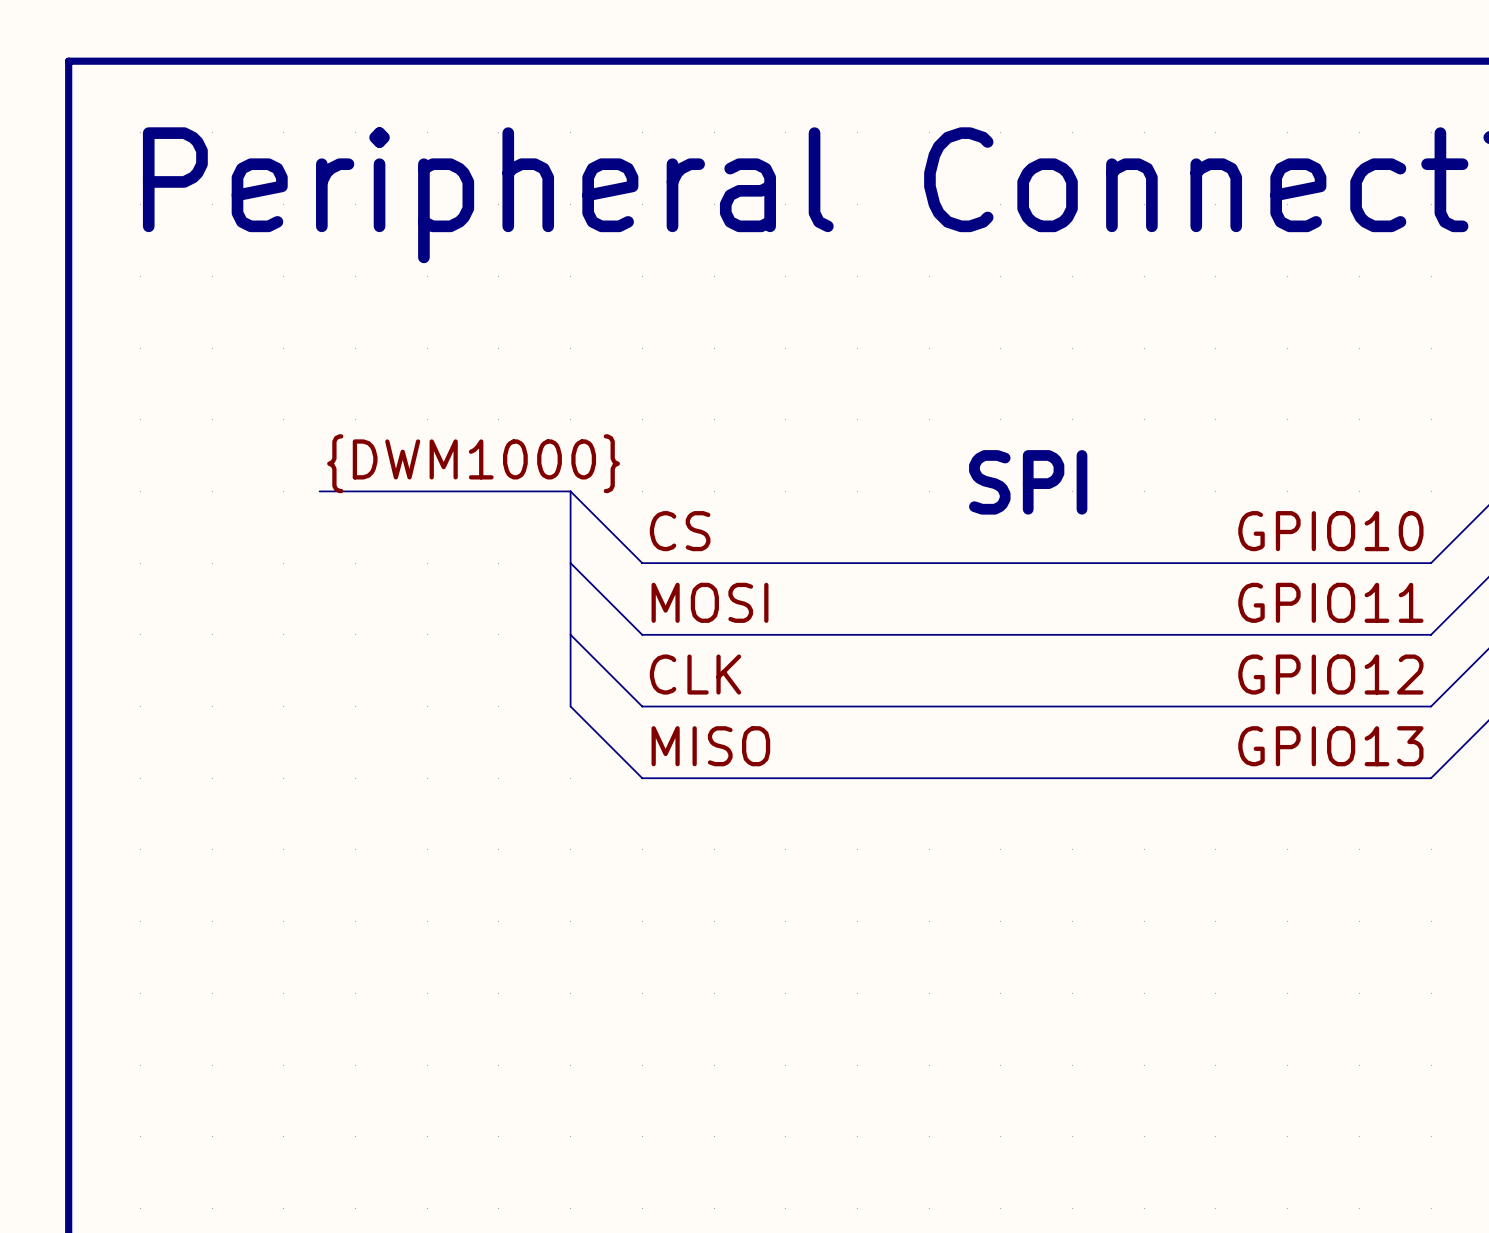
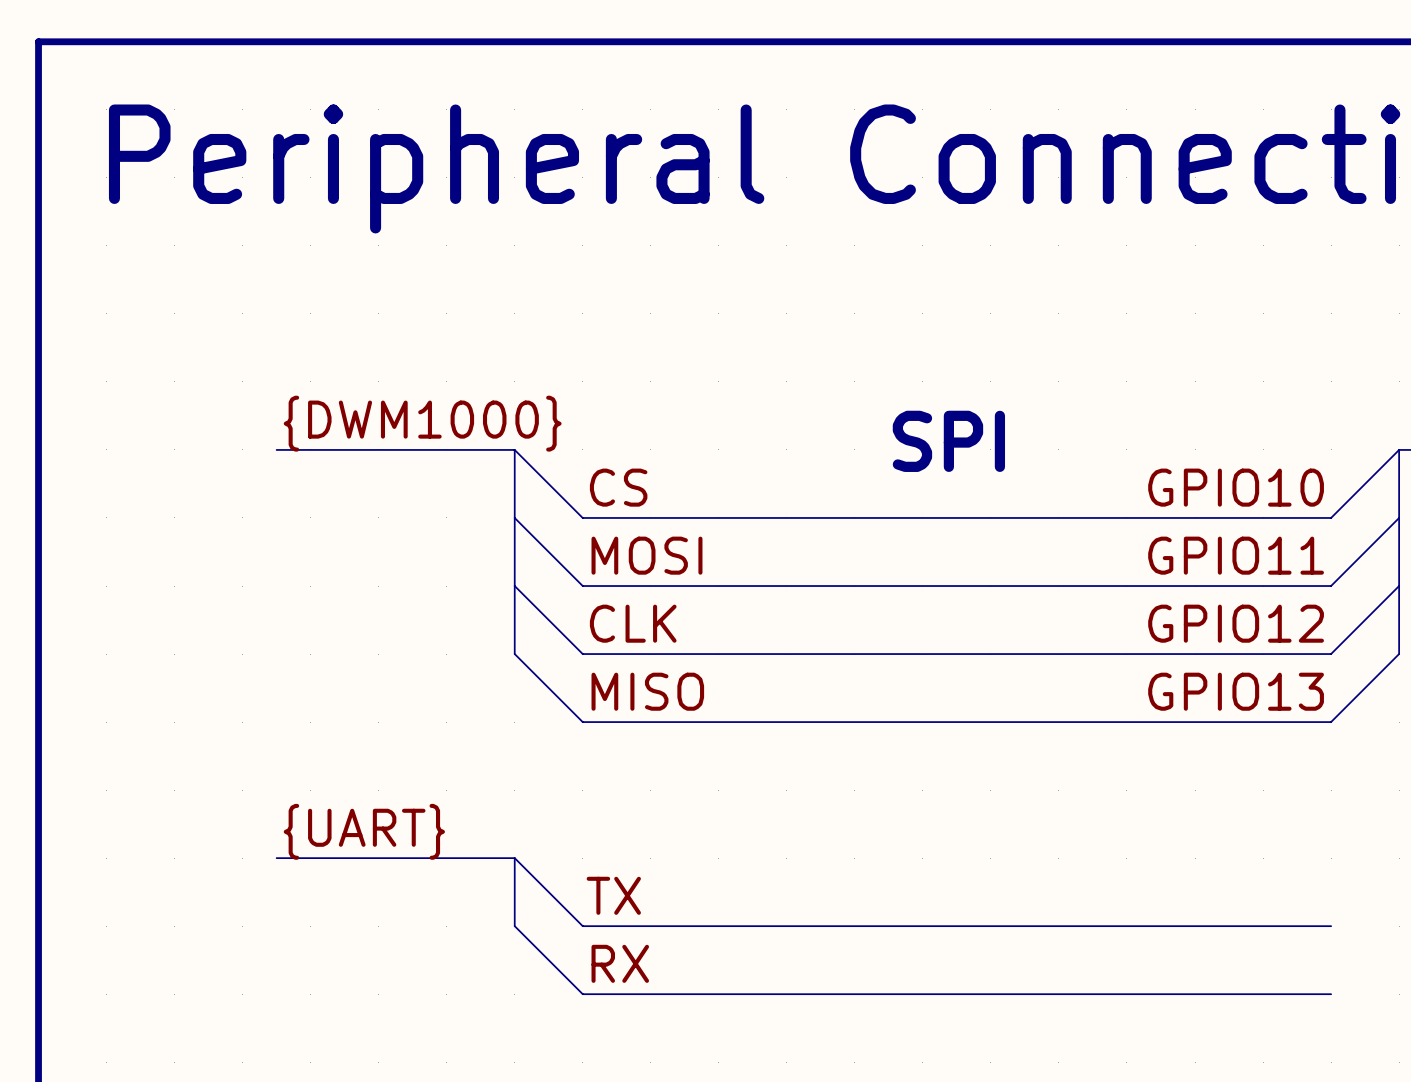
label: none -> {UART} (364, 831)
bus: none -> (276, 858) (514, 858) (514, 926)
wire: none -> (514, 858) (582, 926) (1331, 926)
label: none -> TX (613, 895)
wire: none -> (514, 926) (582, 994) (1331, 994)
label: none -> RX (620, 963)

